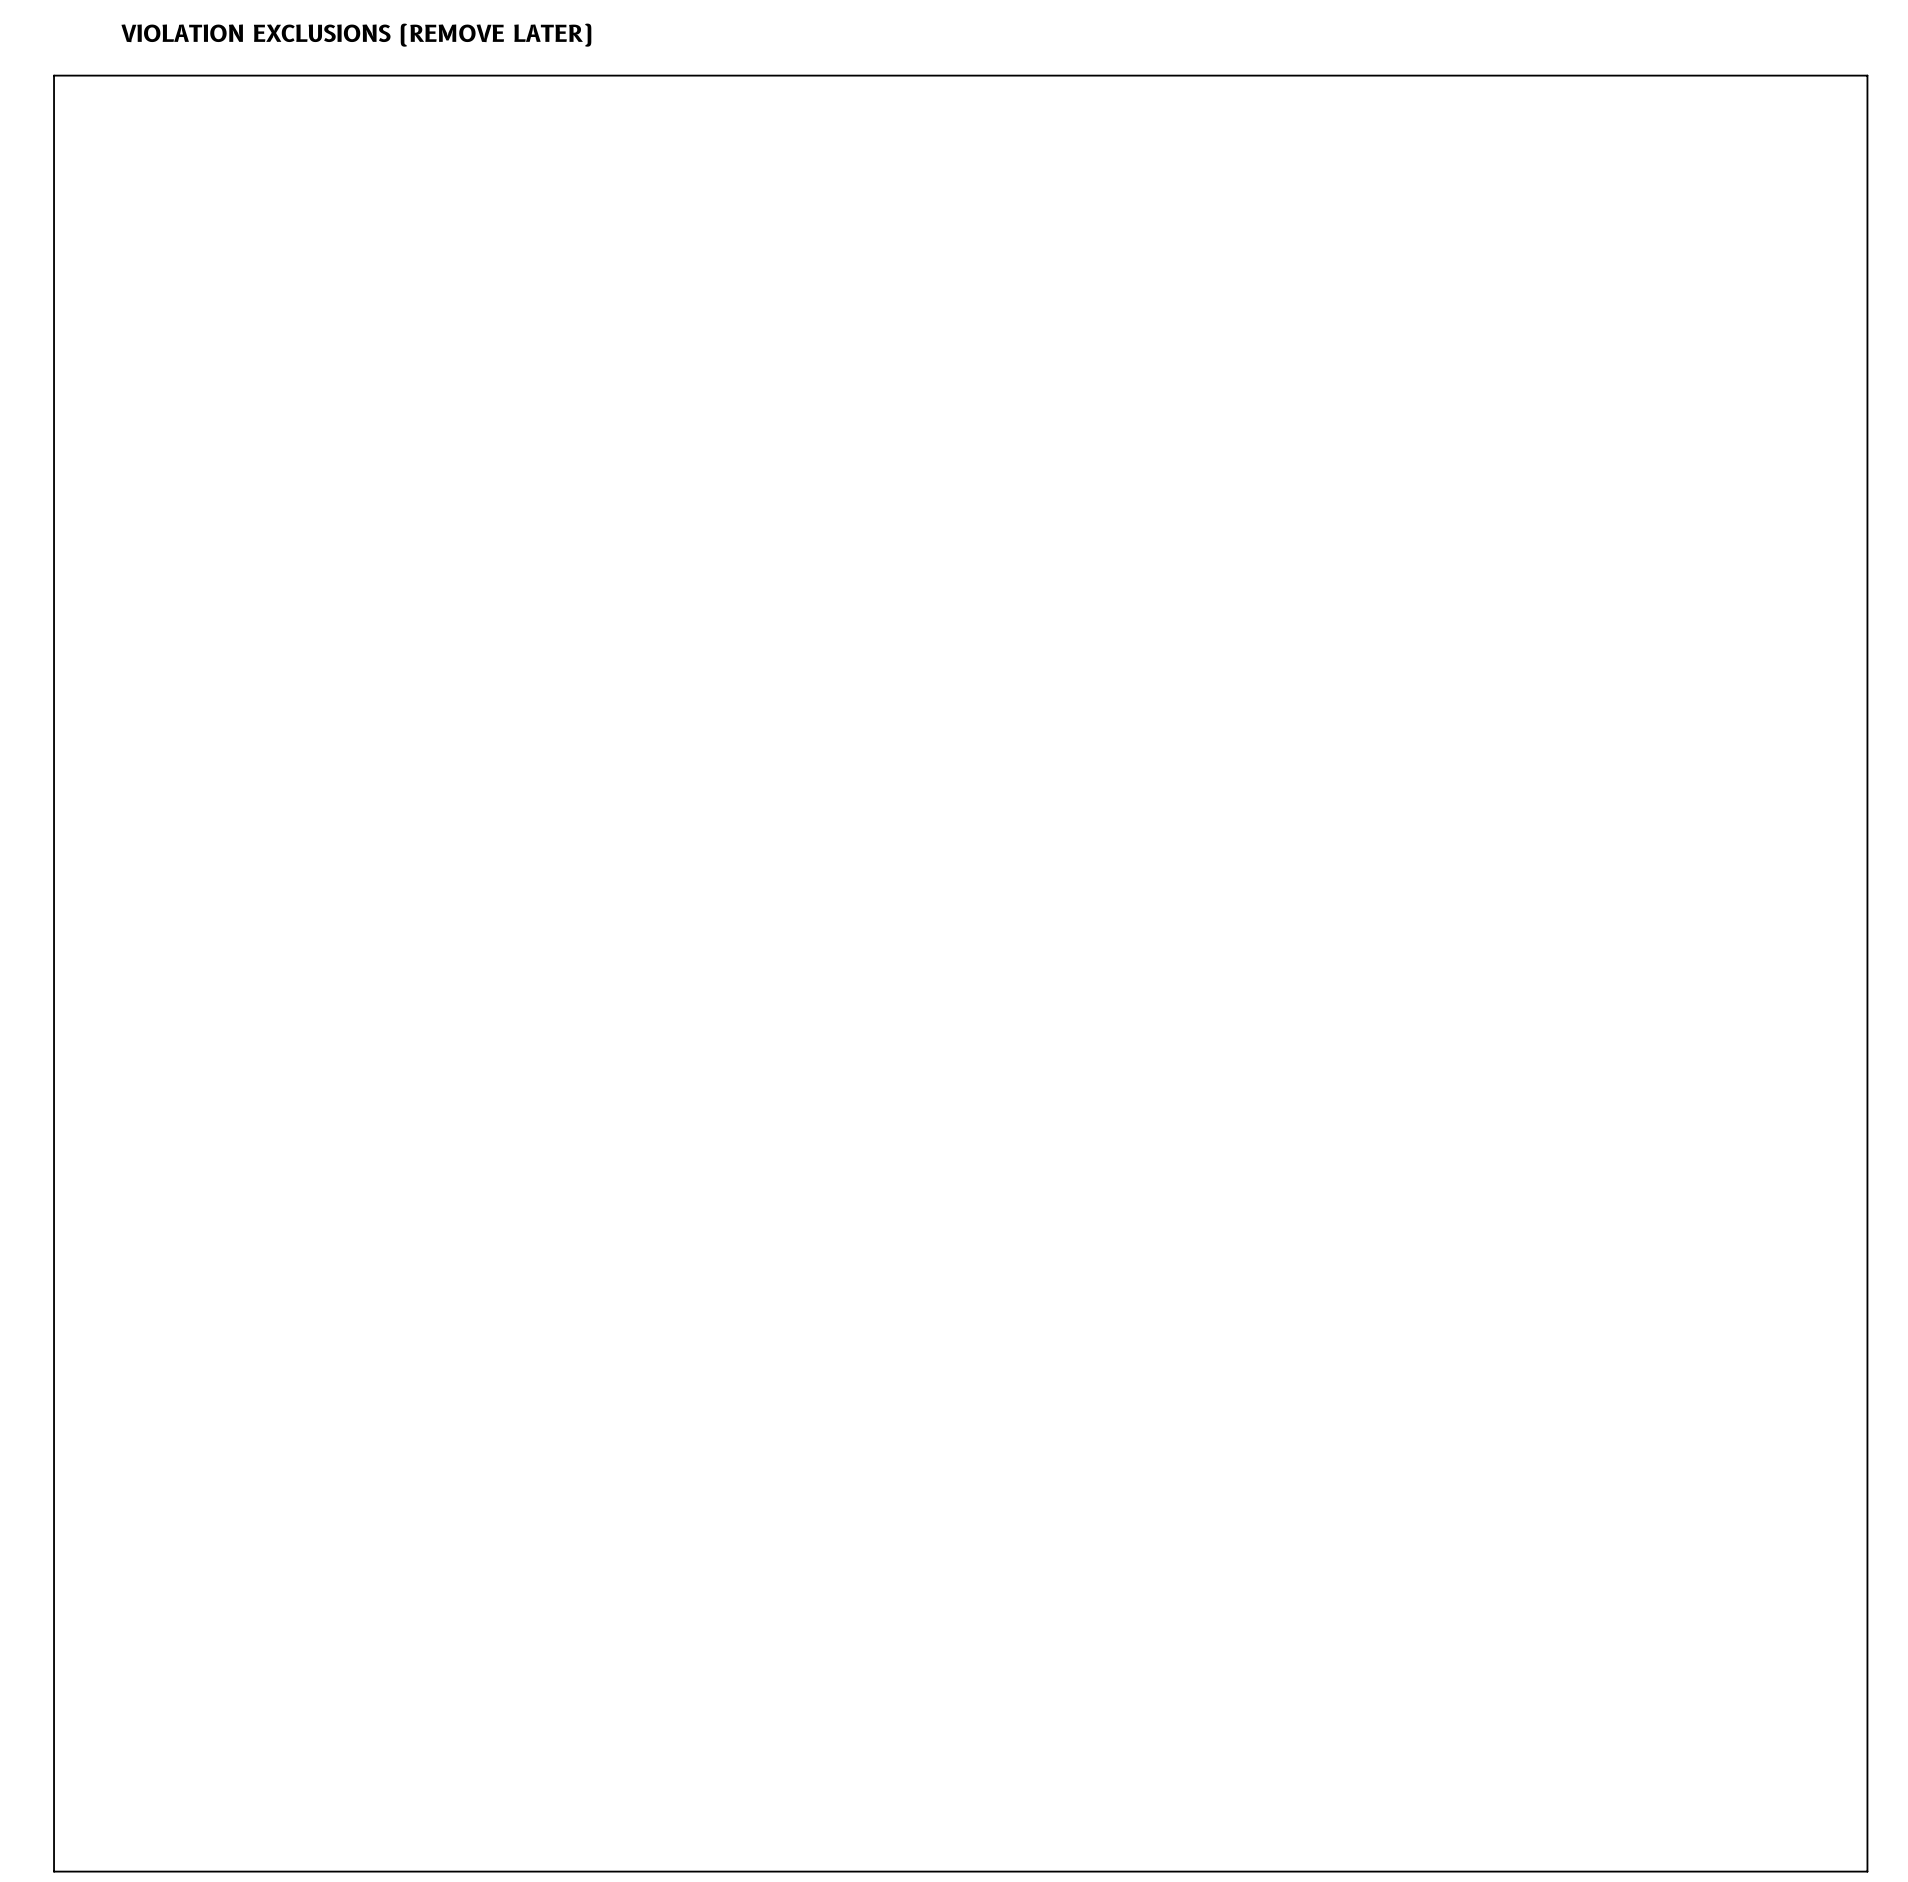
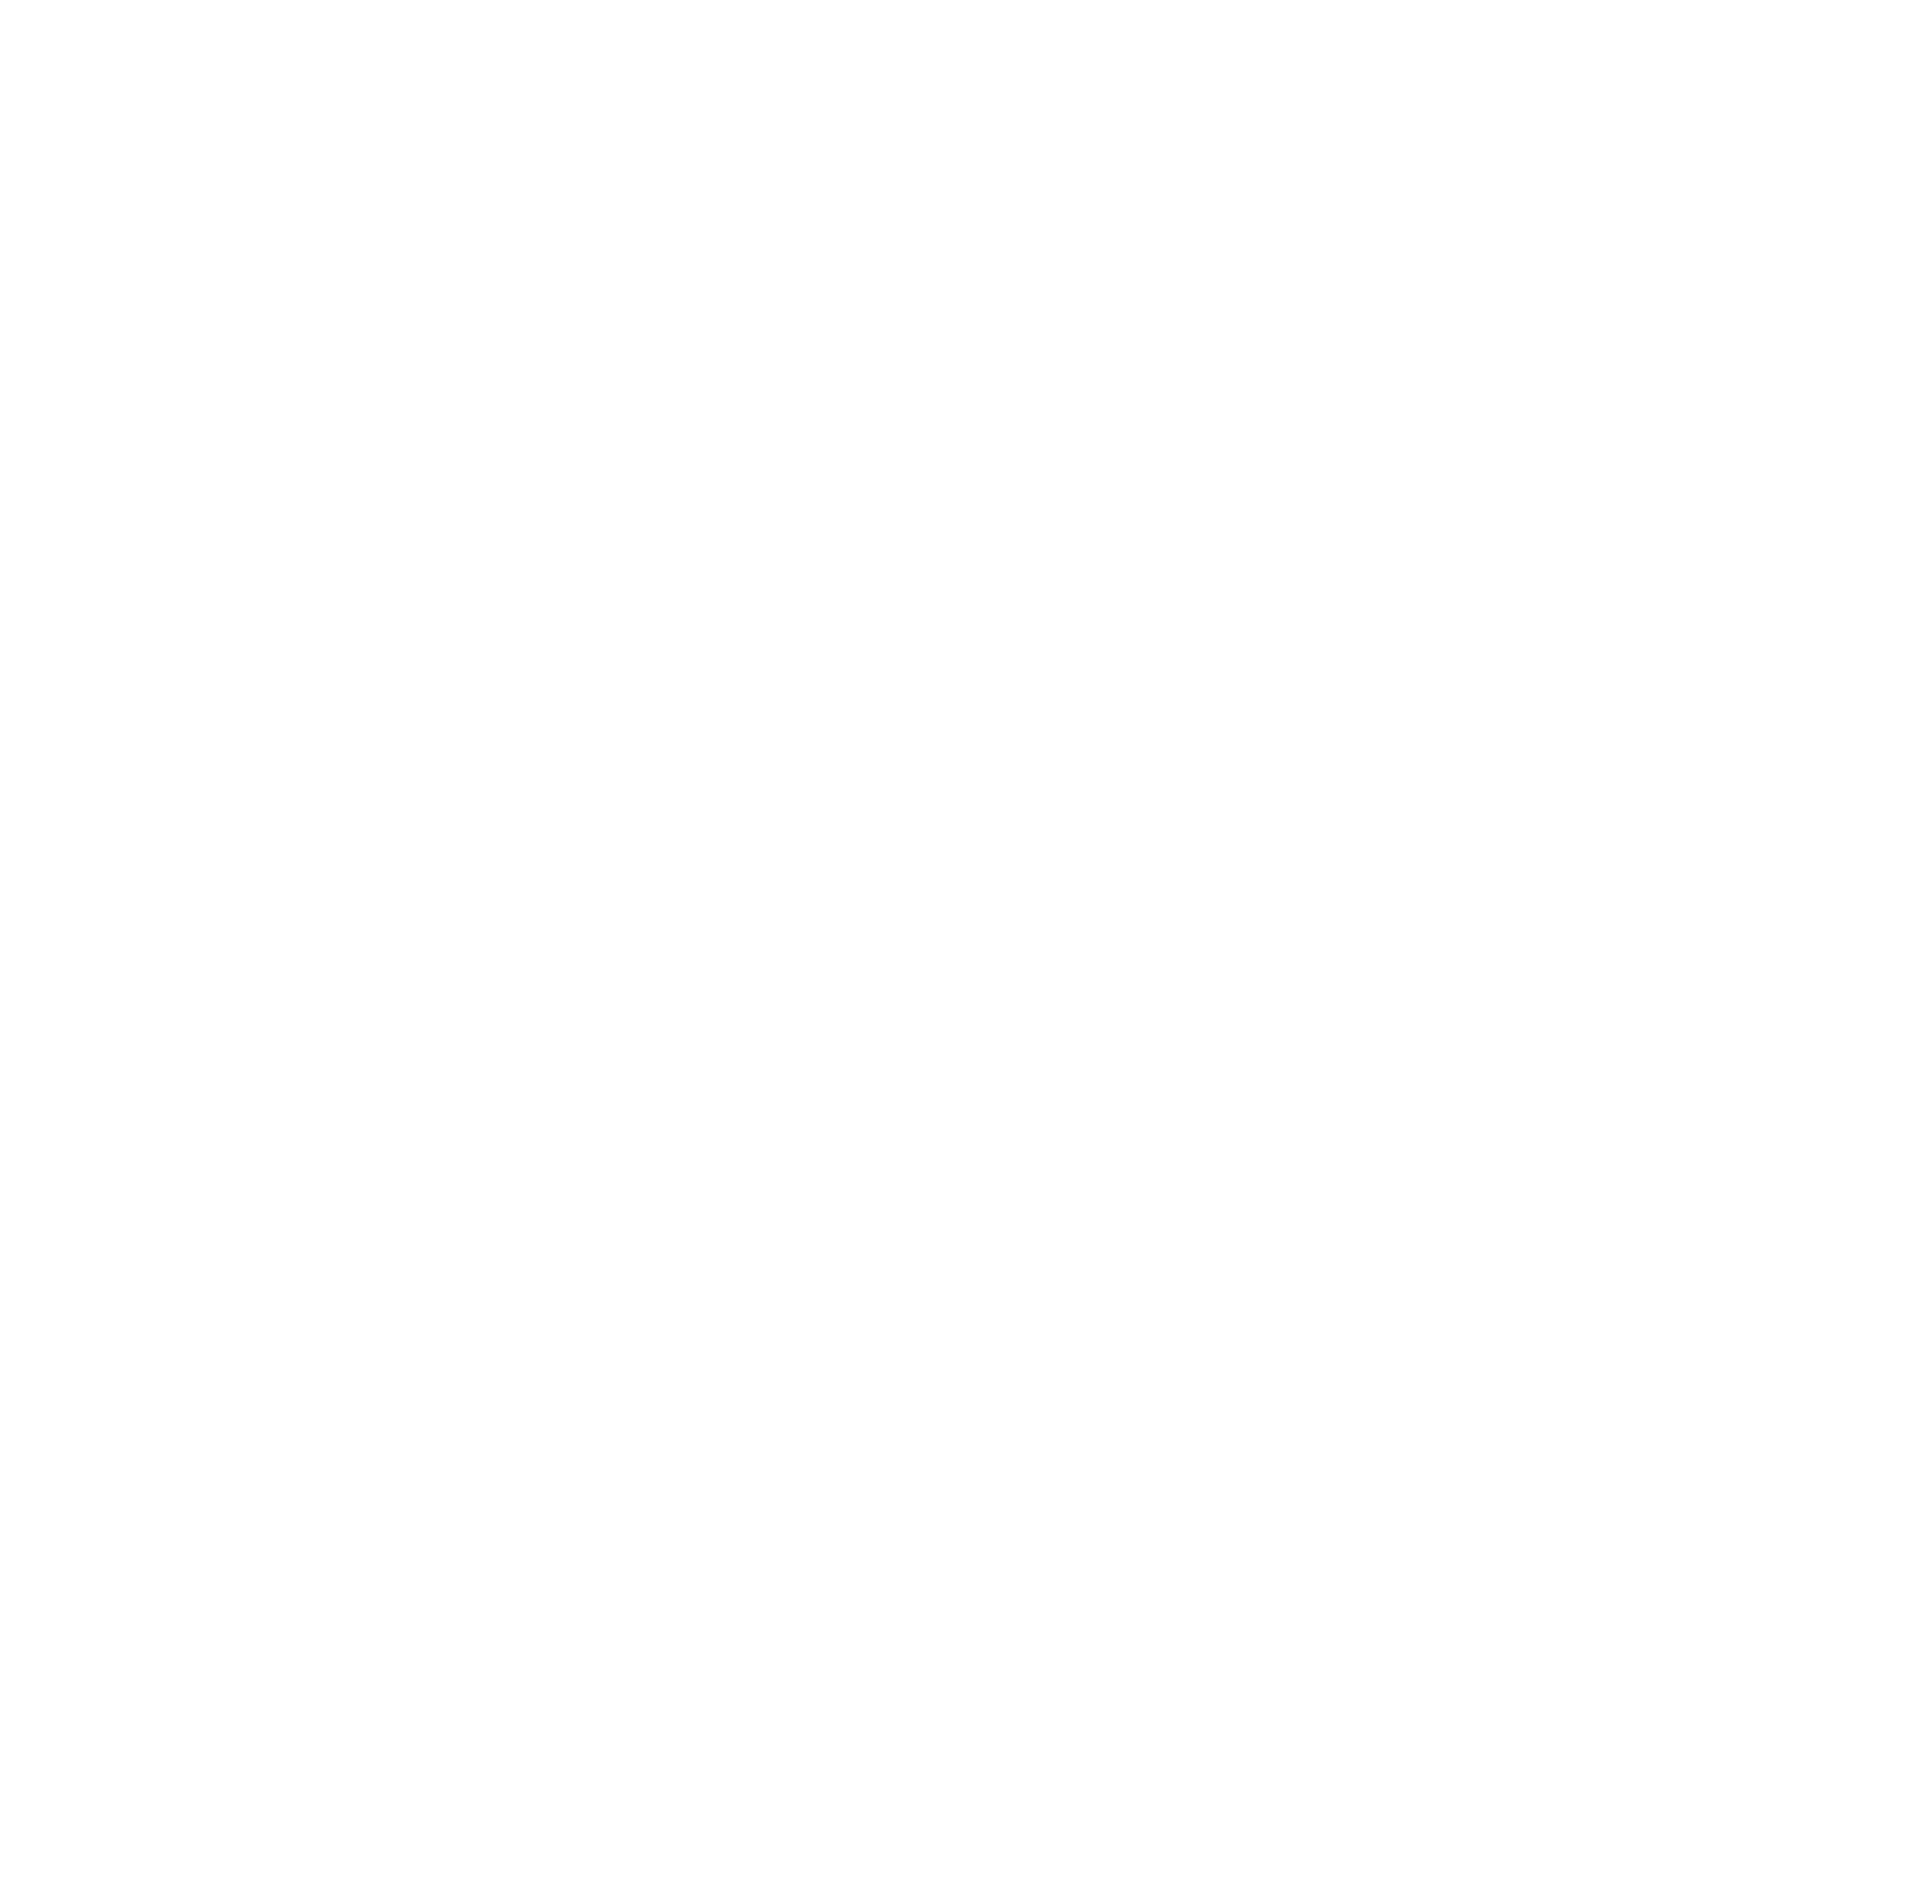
text: VIOLATION EXCLUSIONS (REMOVE LATER) (356, 35) -> none
line: (54, 75) (1867, 75) (1867, 1871) (54, 1871) (54, 75) -> none

